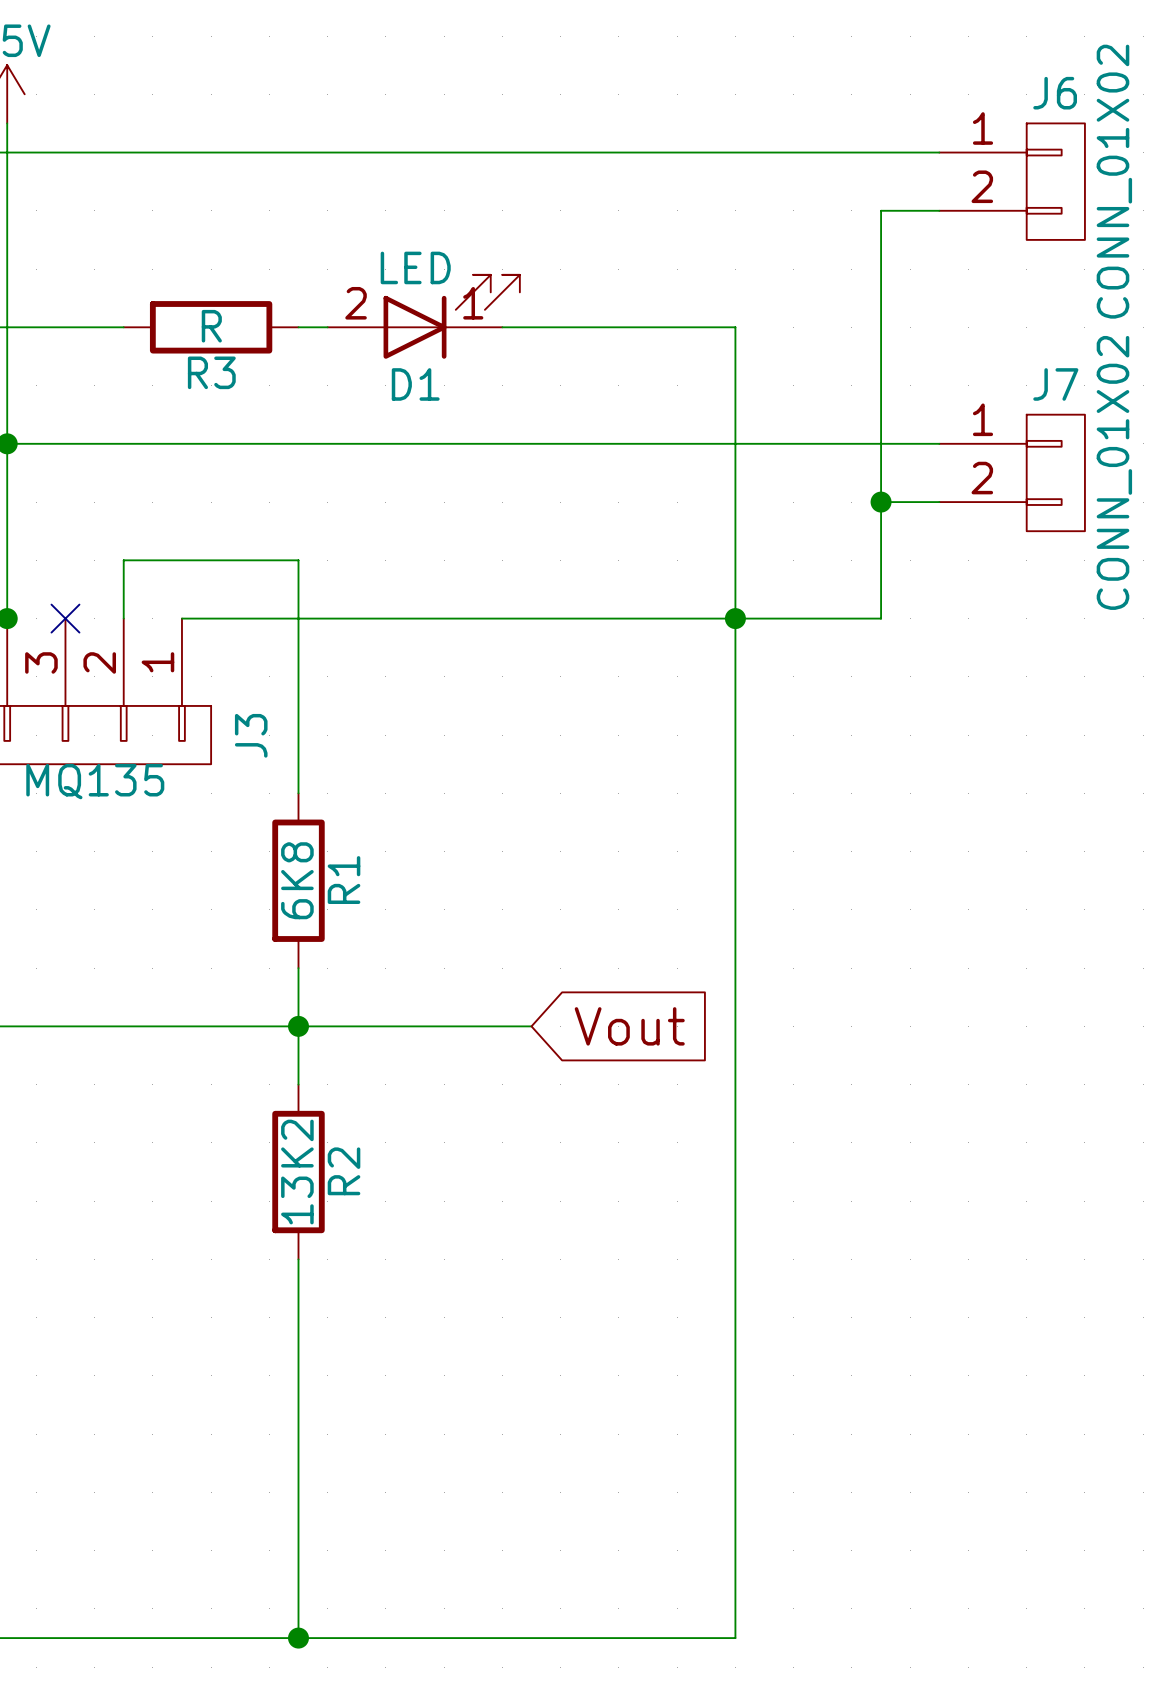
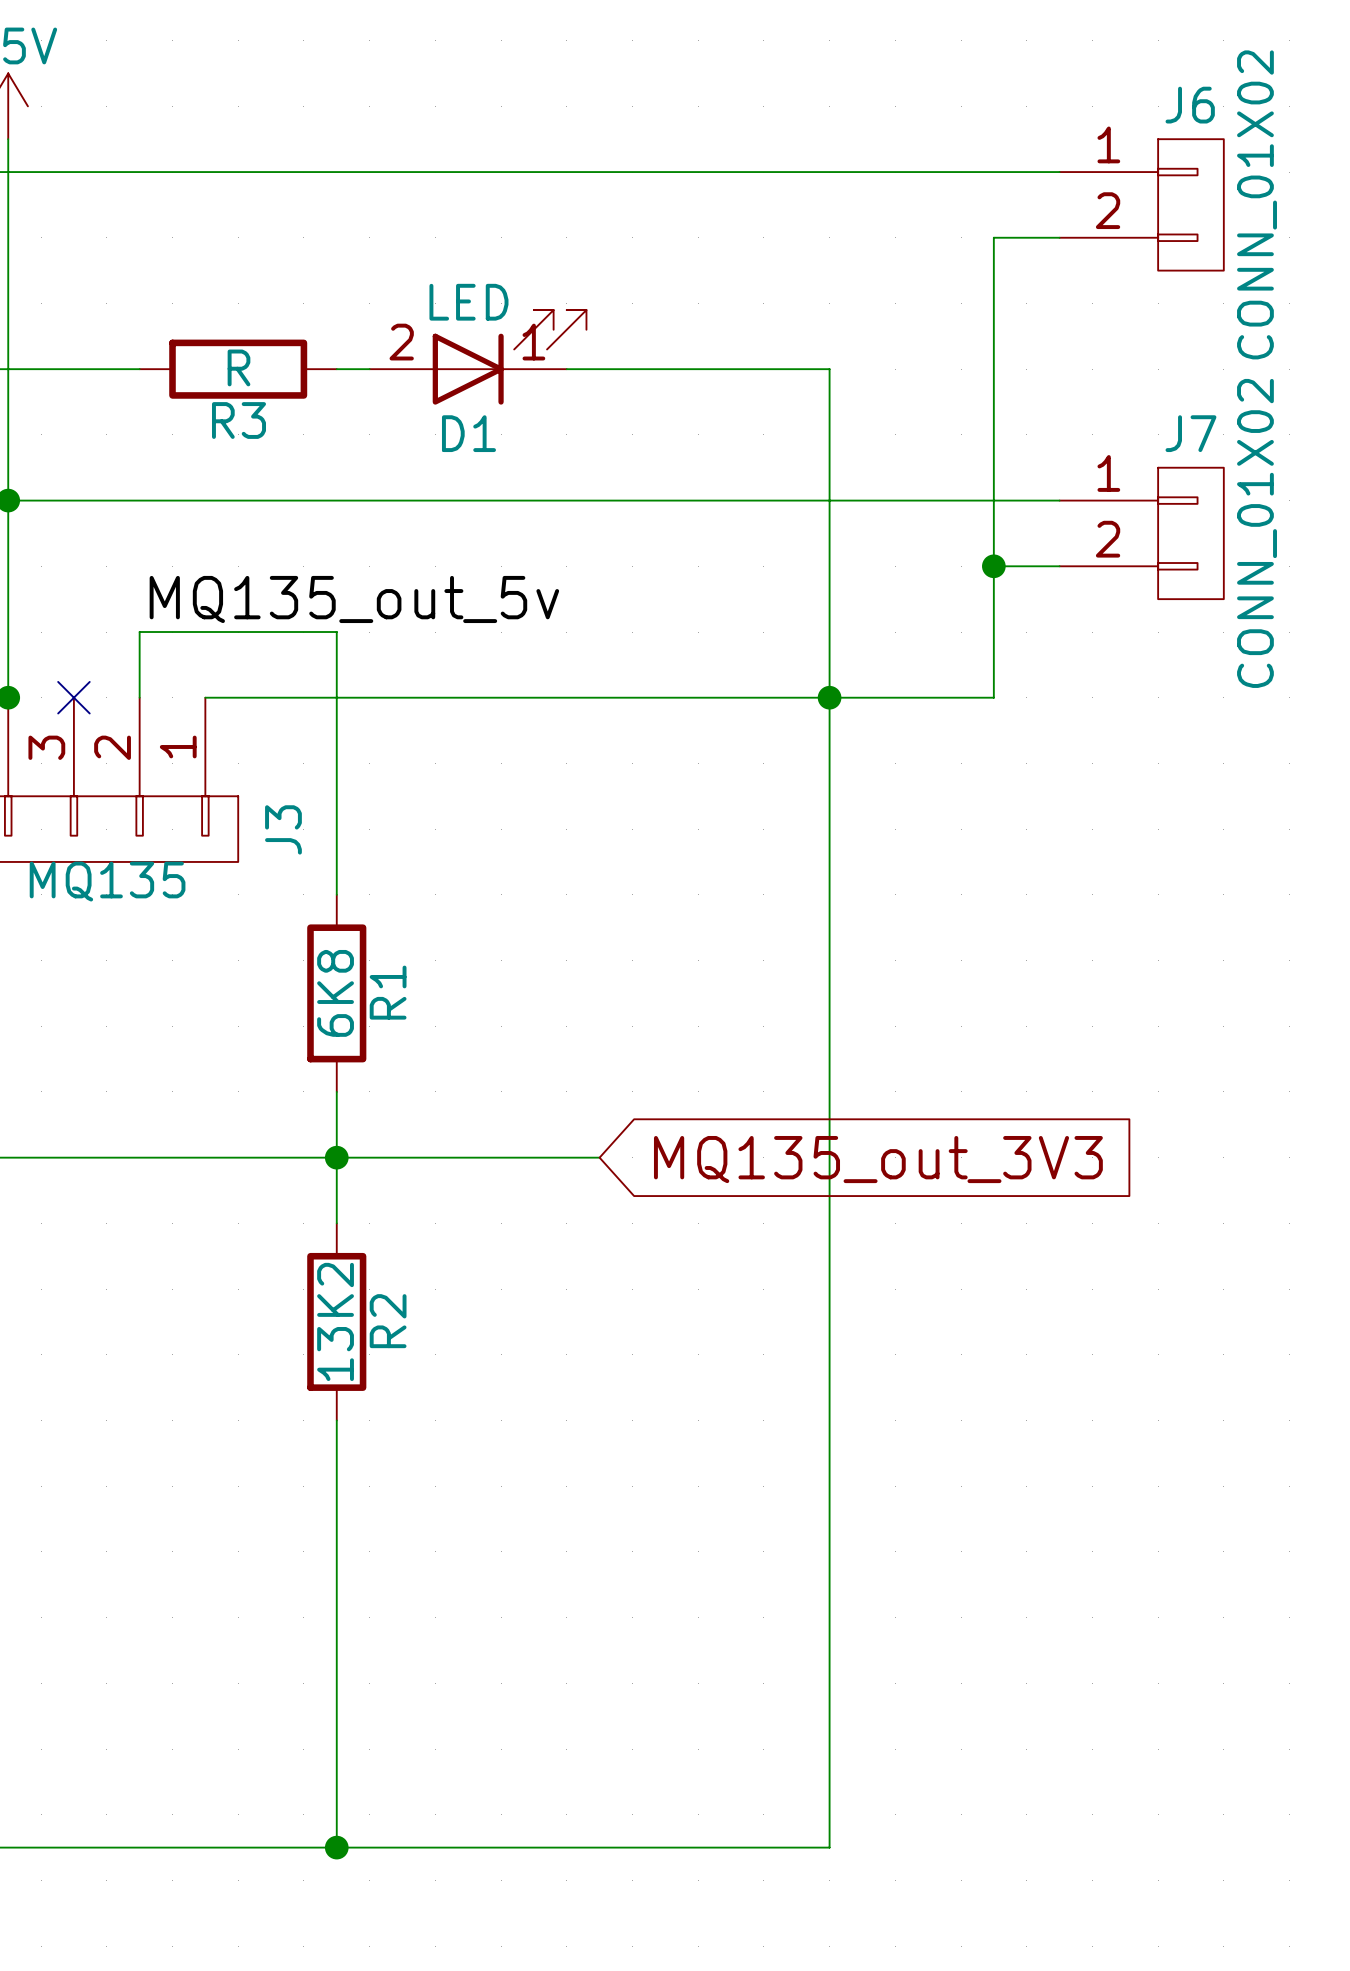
label: none -> MQ135_out_5v (354, 599)
global label: Vout (629, 1026) -> MQ135_out_3V3 (878, 1159)

